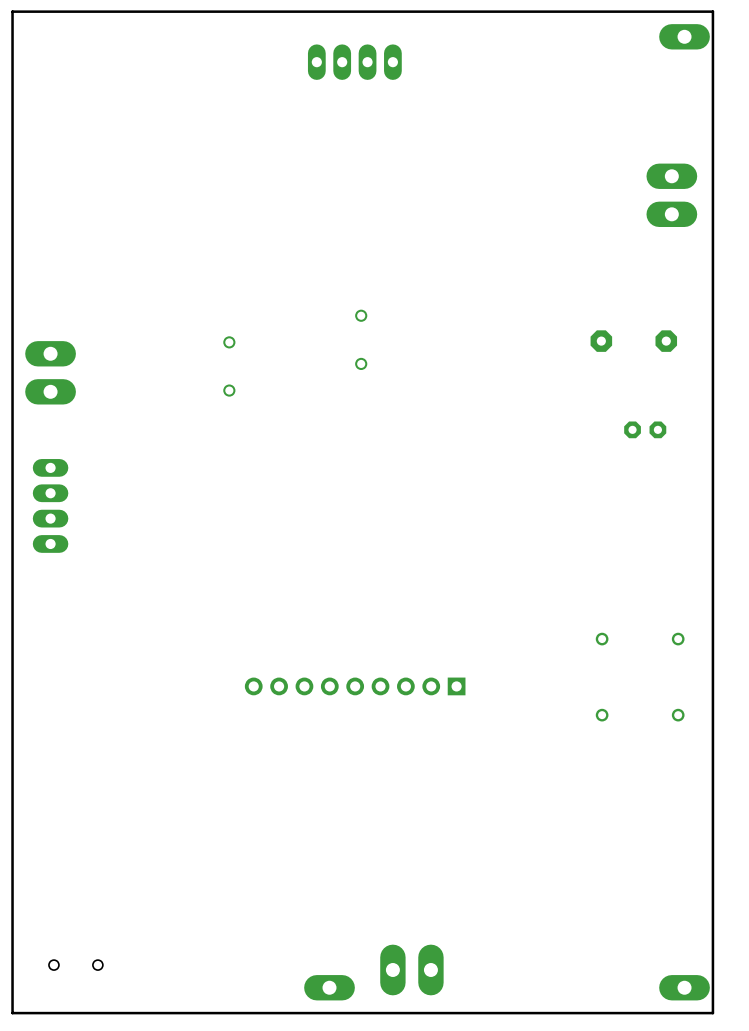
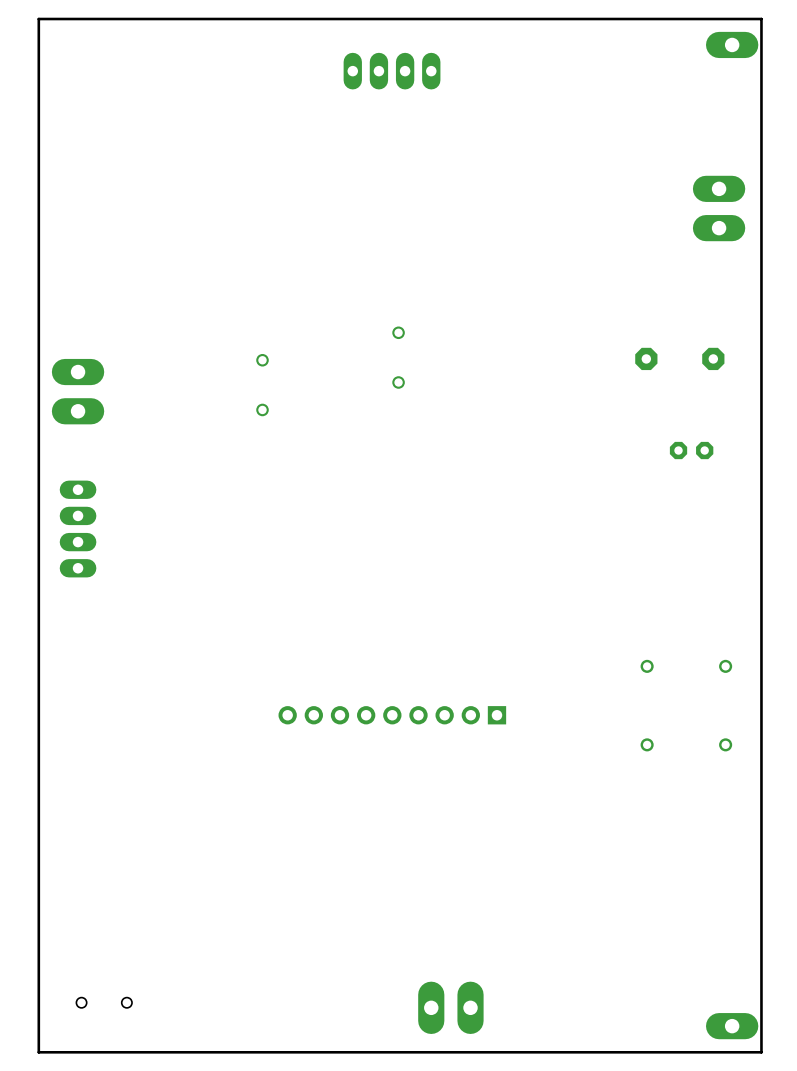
part: (329, 987) -> none

